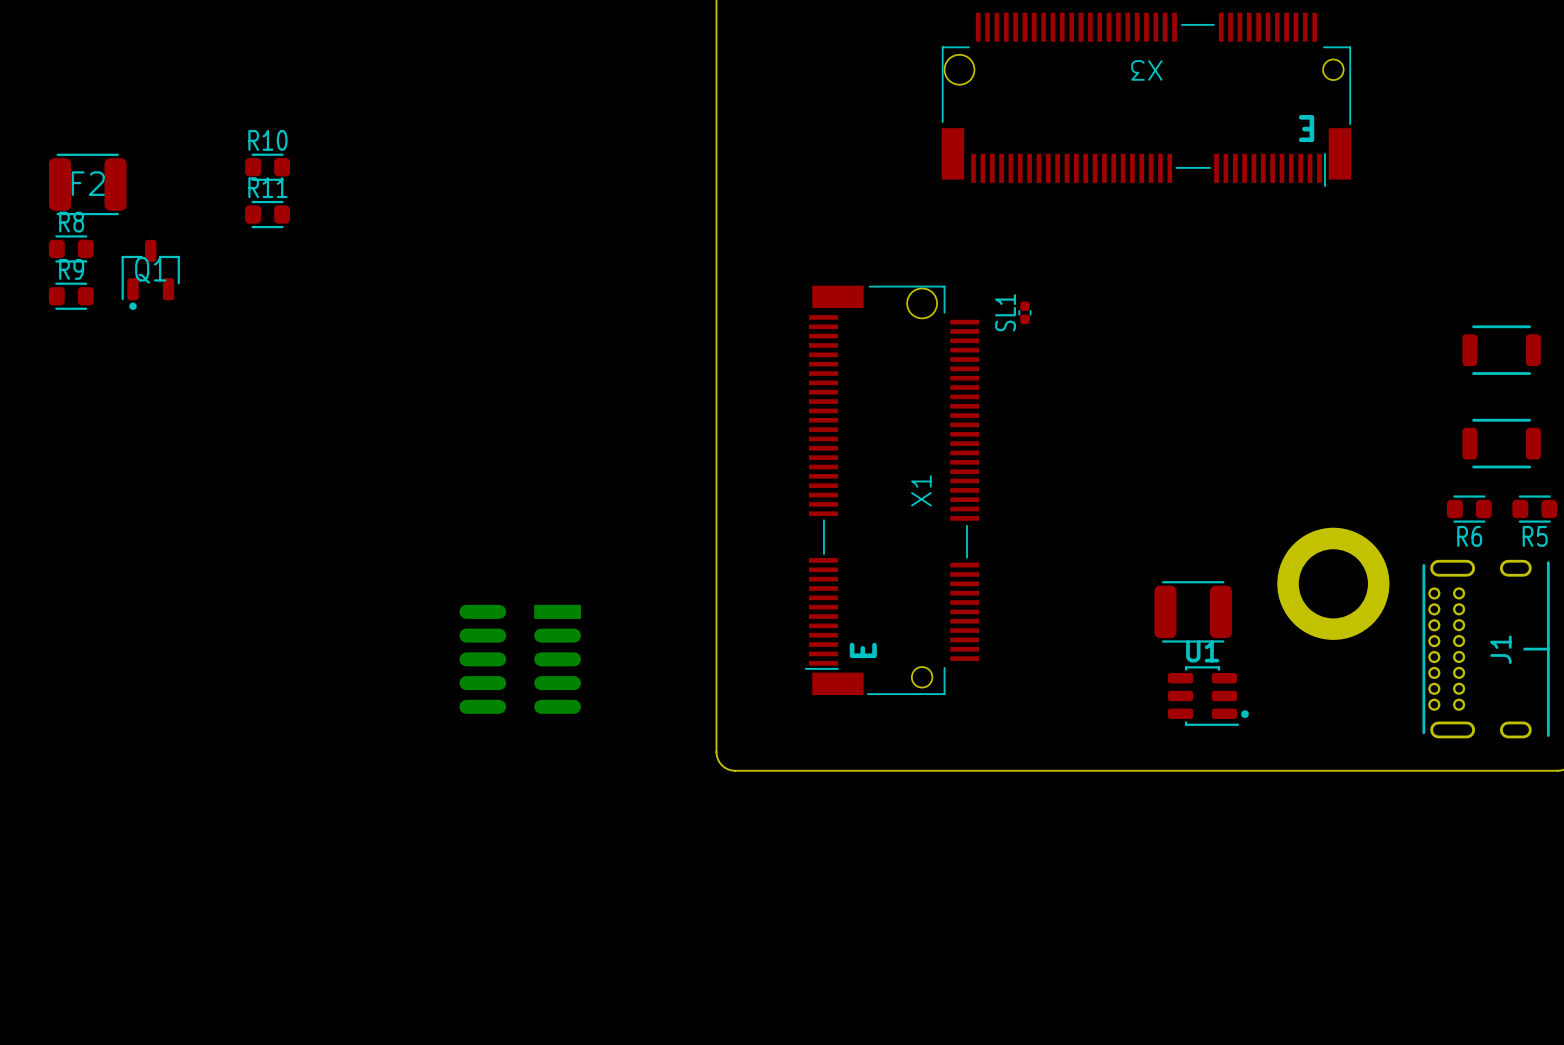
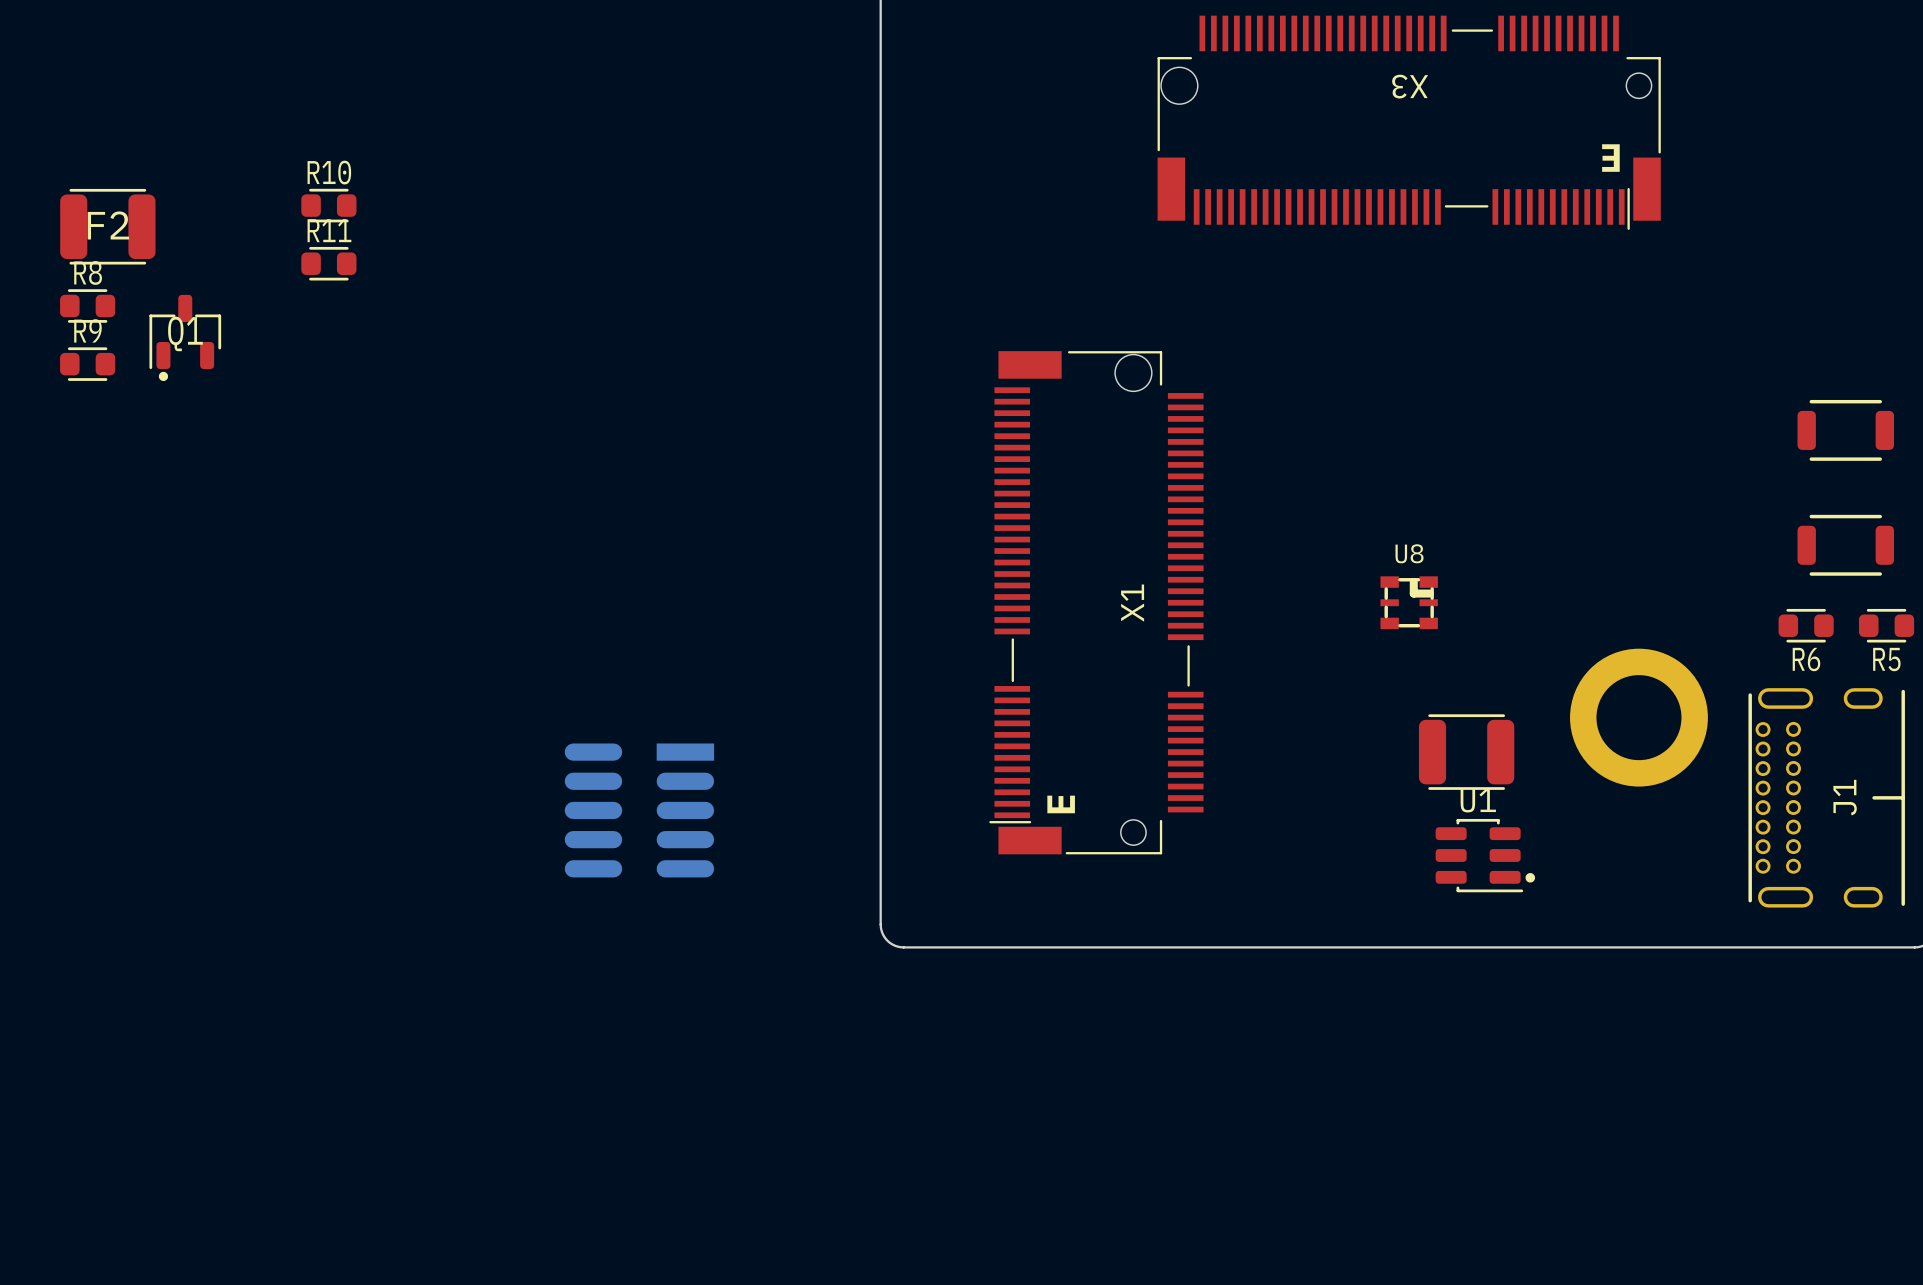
SL1: (1024, 312) -> none
U8: none -> (1409, 602)

